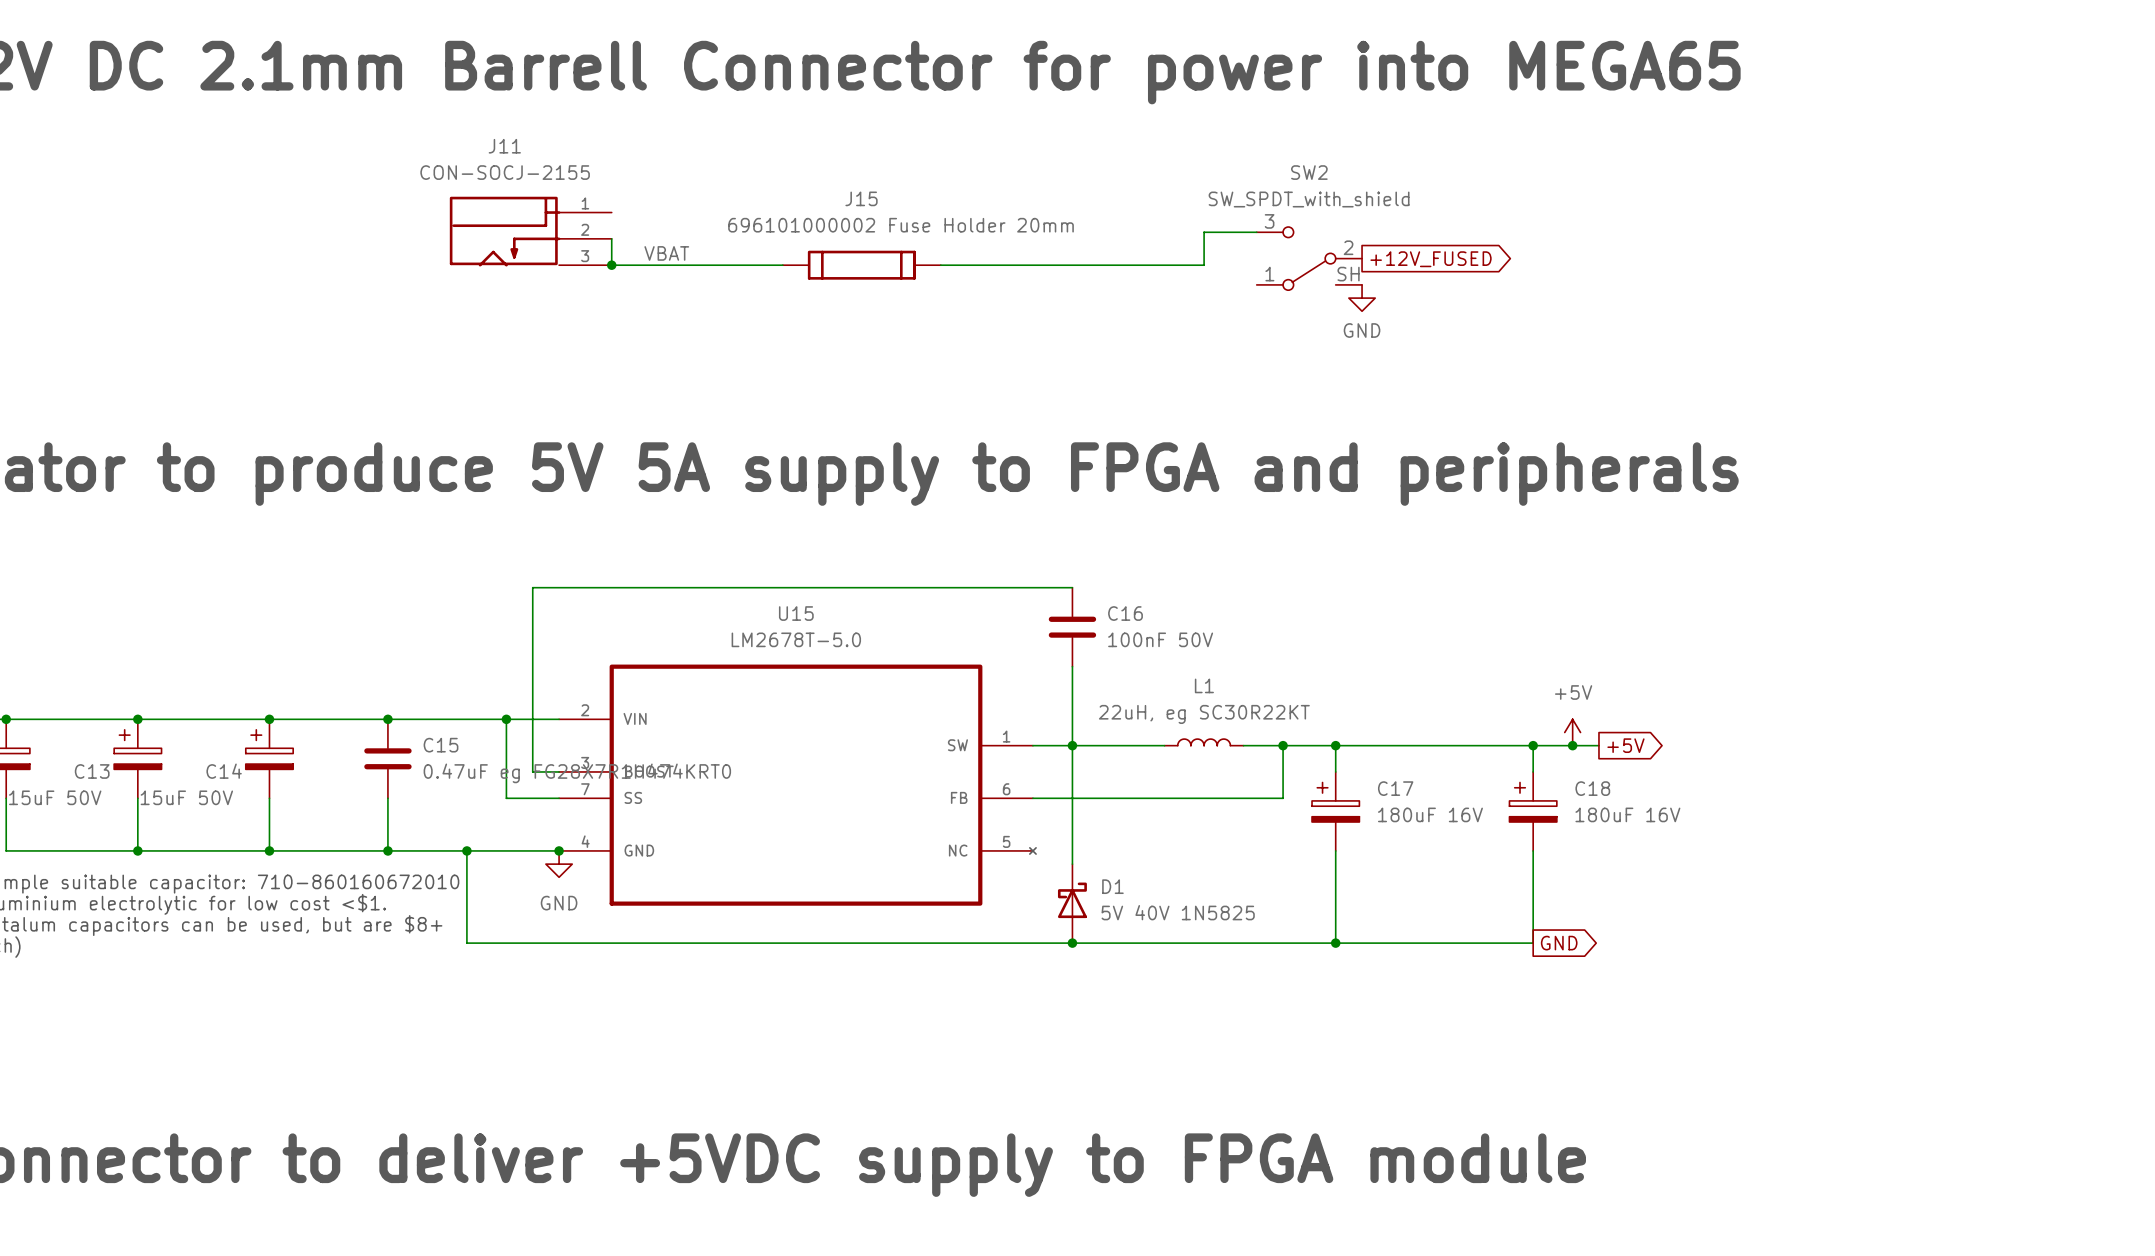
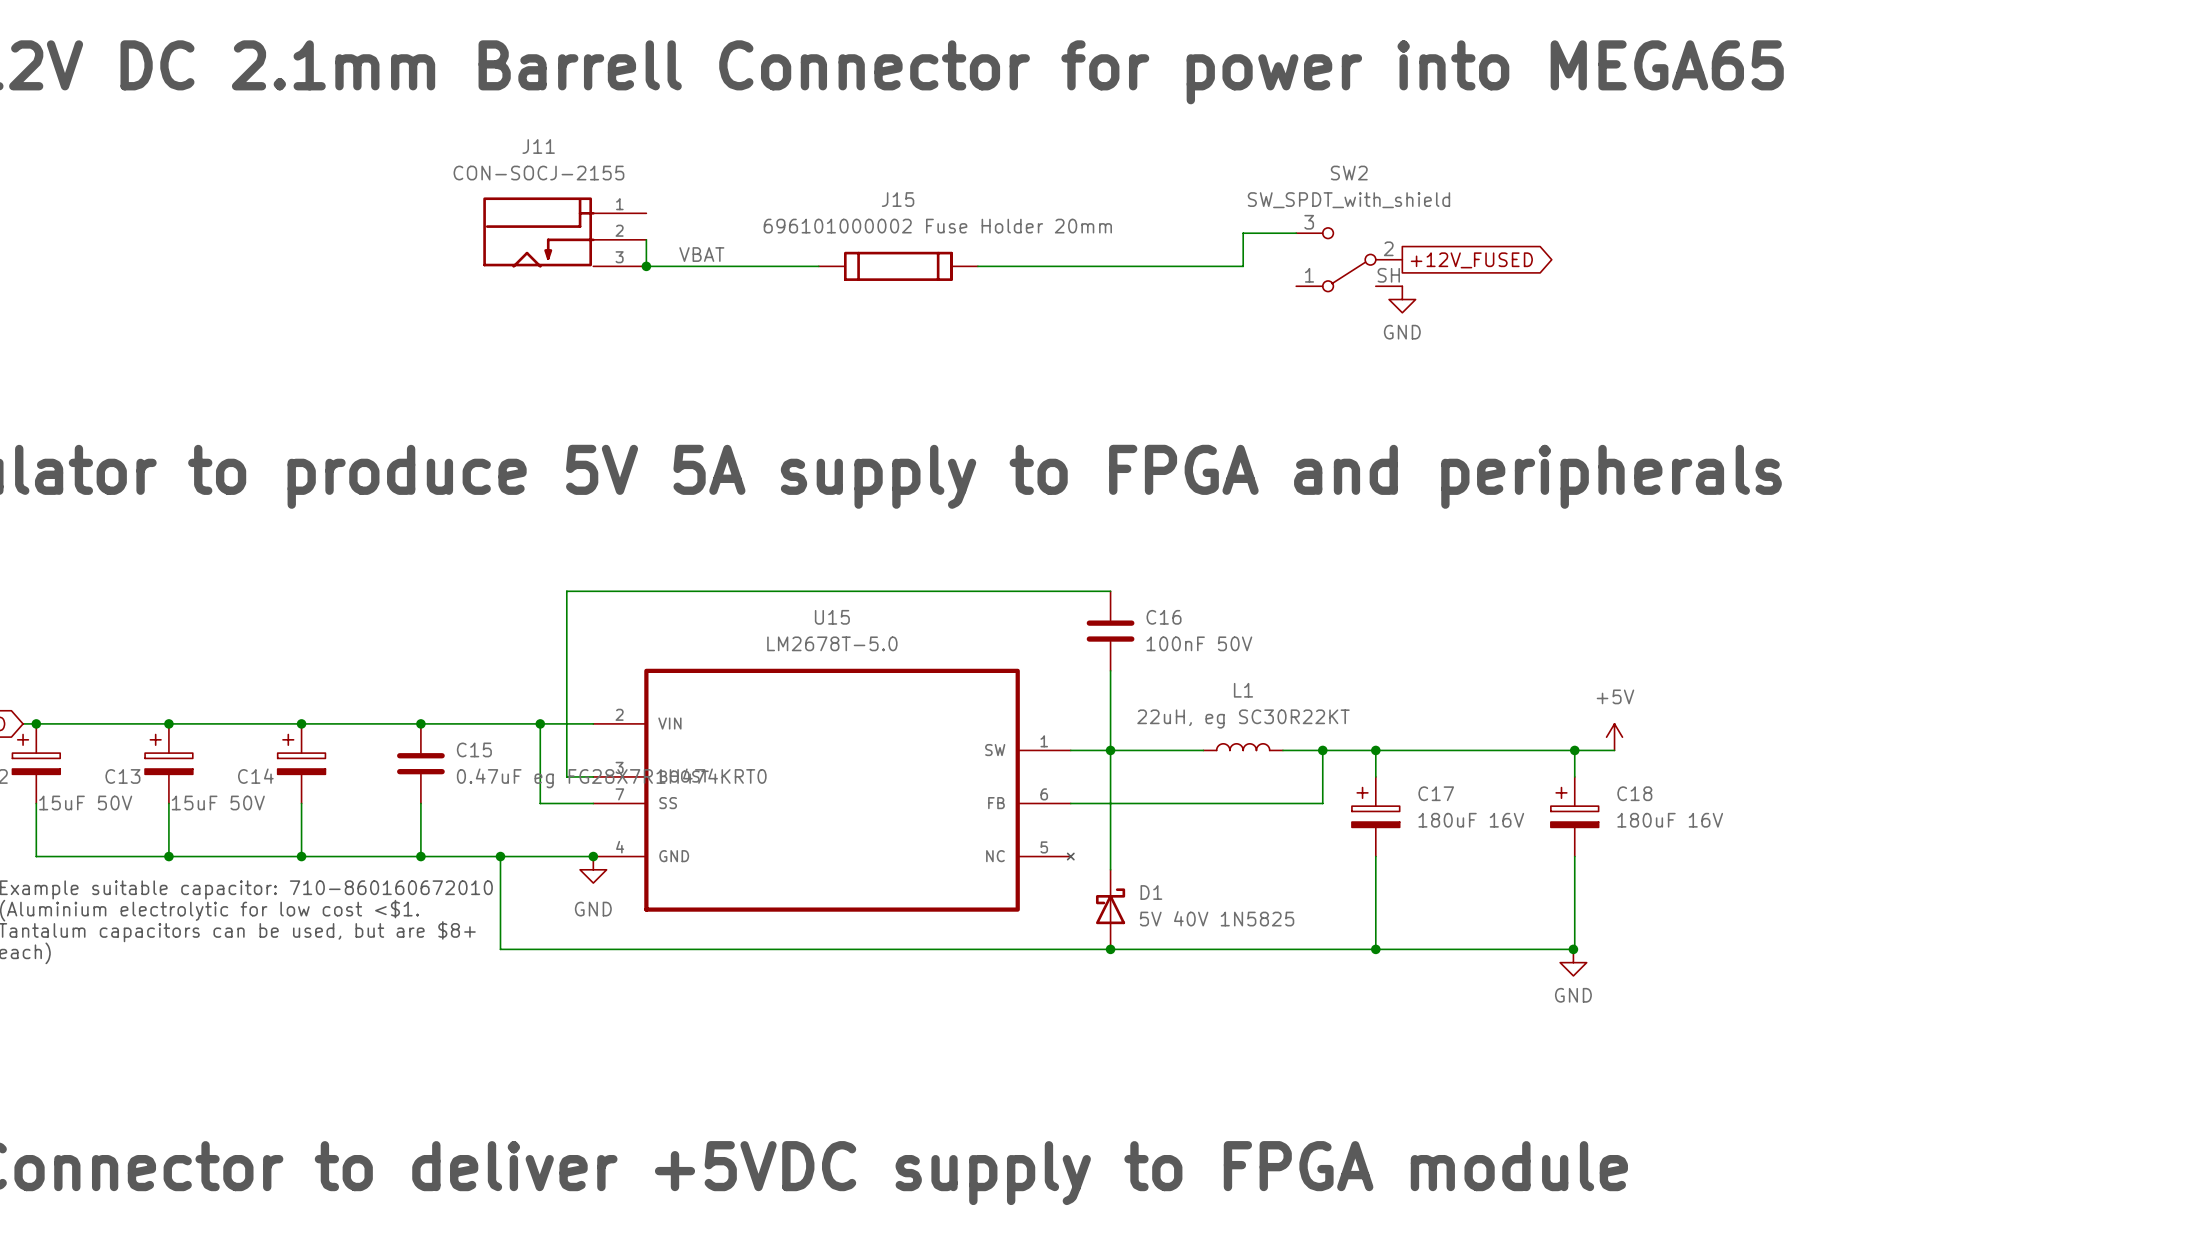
wire: (1572, 745) (1598, 745) -> none
junction: (1572, 745) -> none
global label: +5V (1625, 745) -> none
junction: none -> (1573, 949)
global label: GND (1559, 943) -> none
power symbol: none -> GND (1573, 962)

